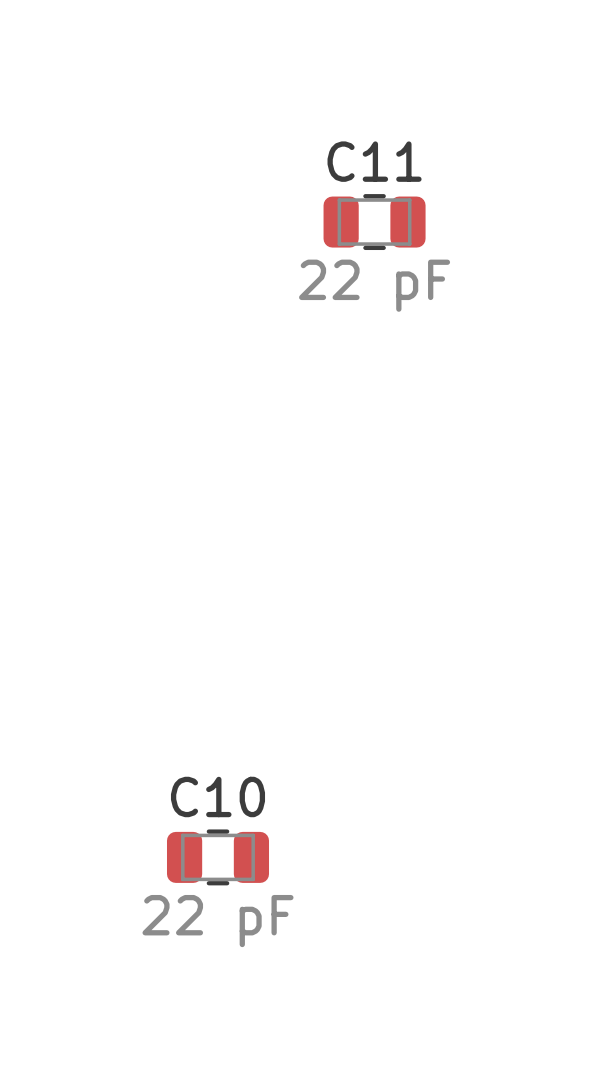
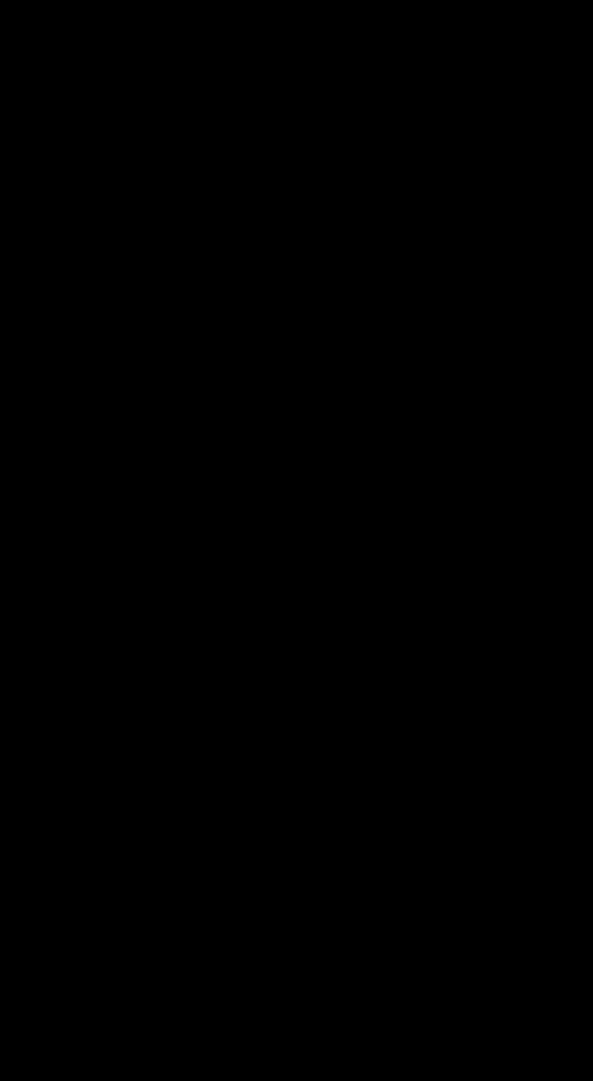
C11: 22 pF (374, 222) -> none
C10: 22 pF (218, 857) -> none

